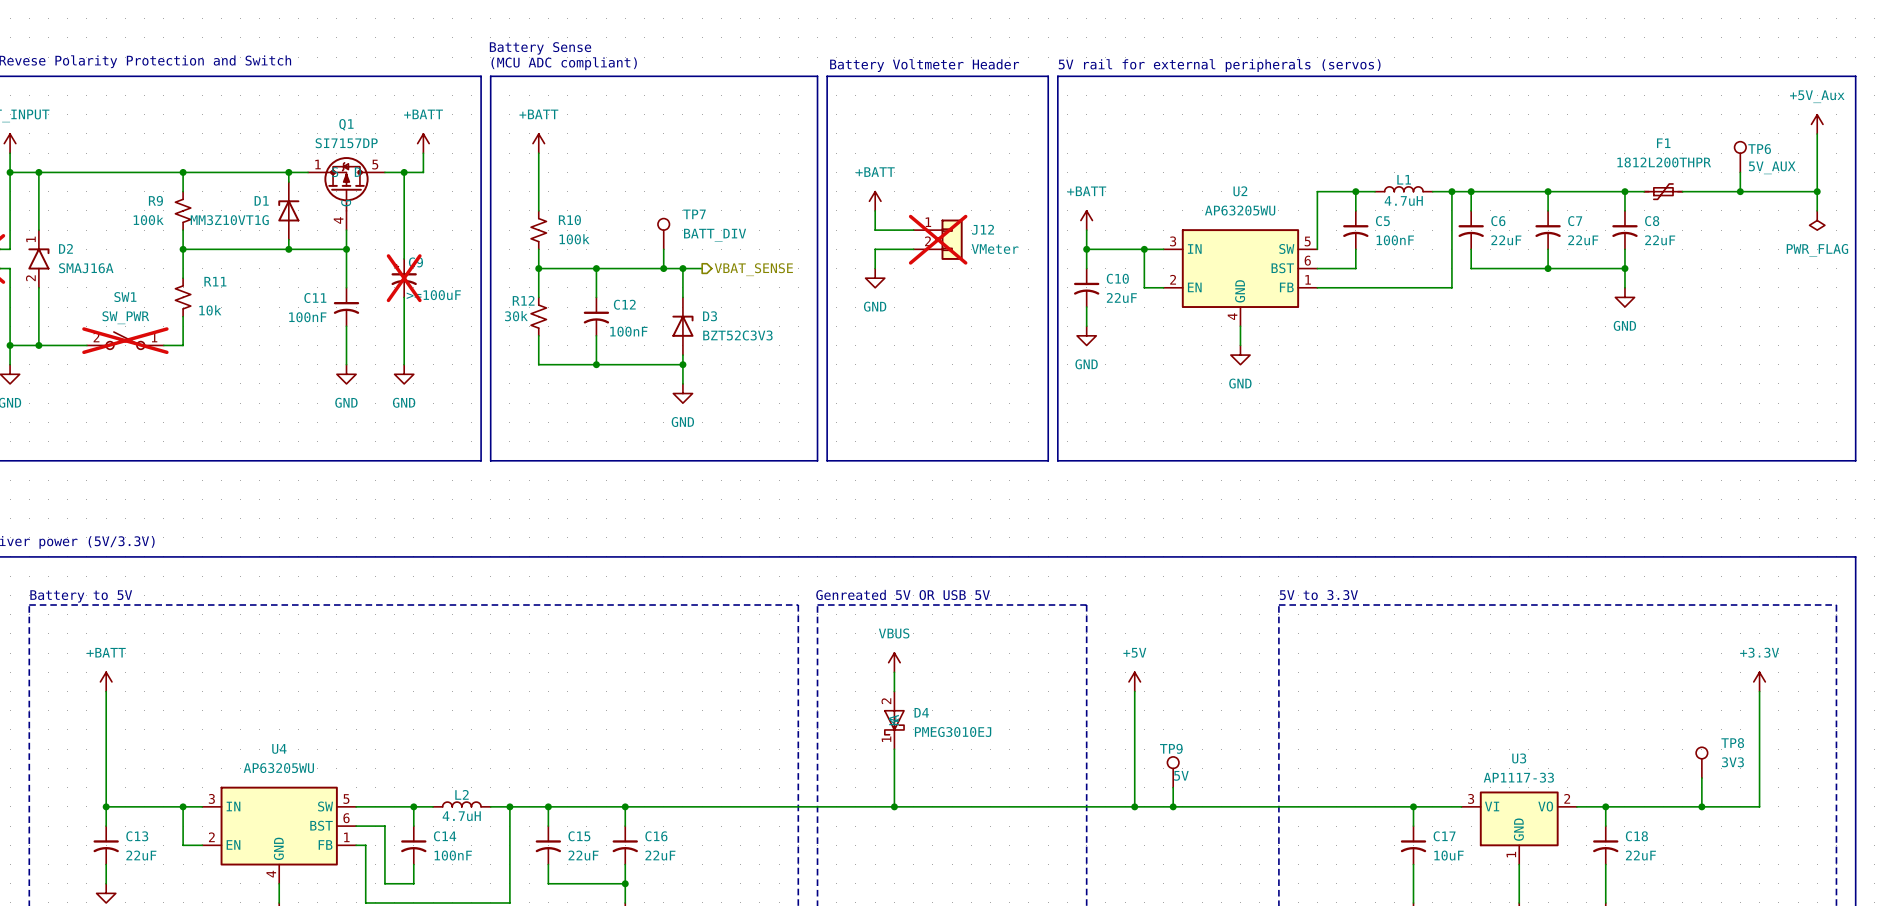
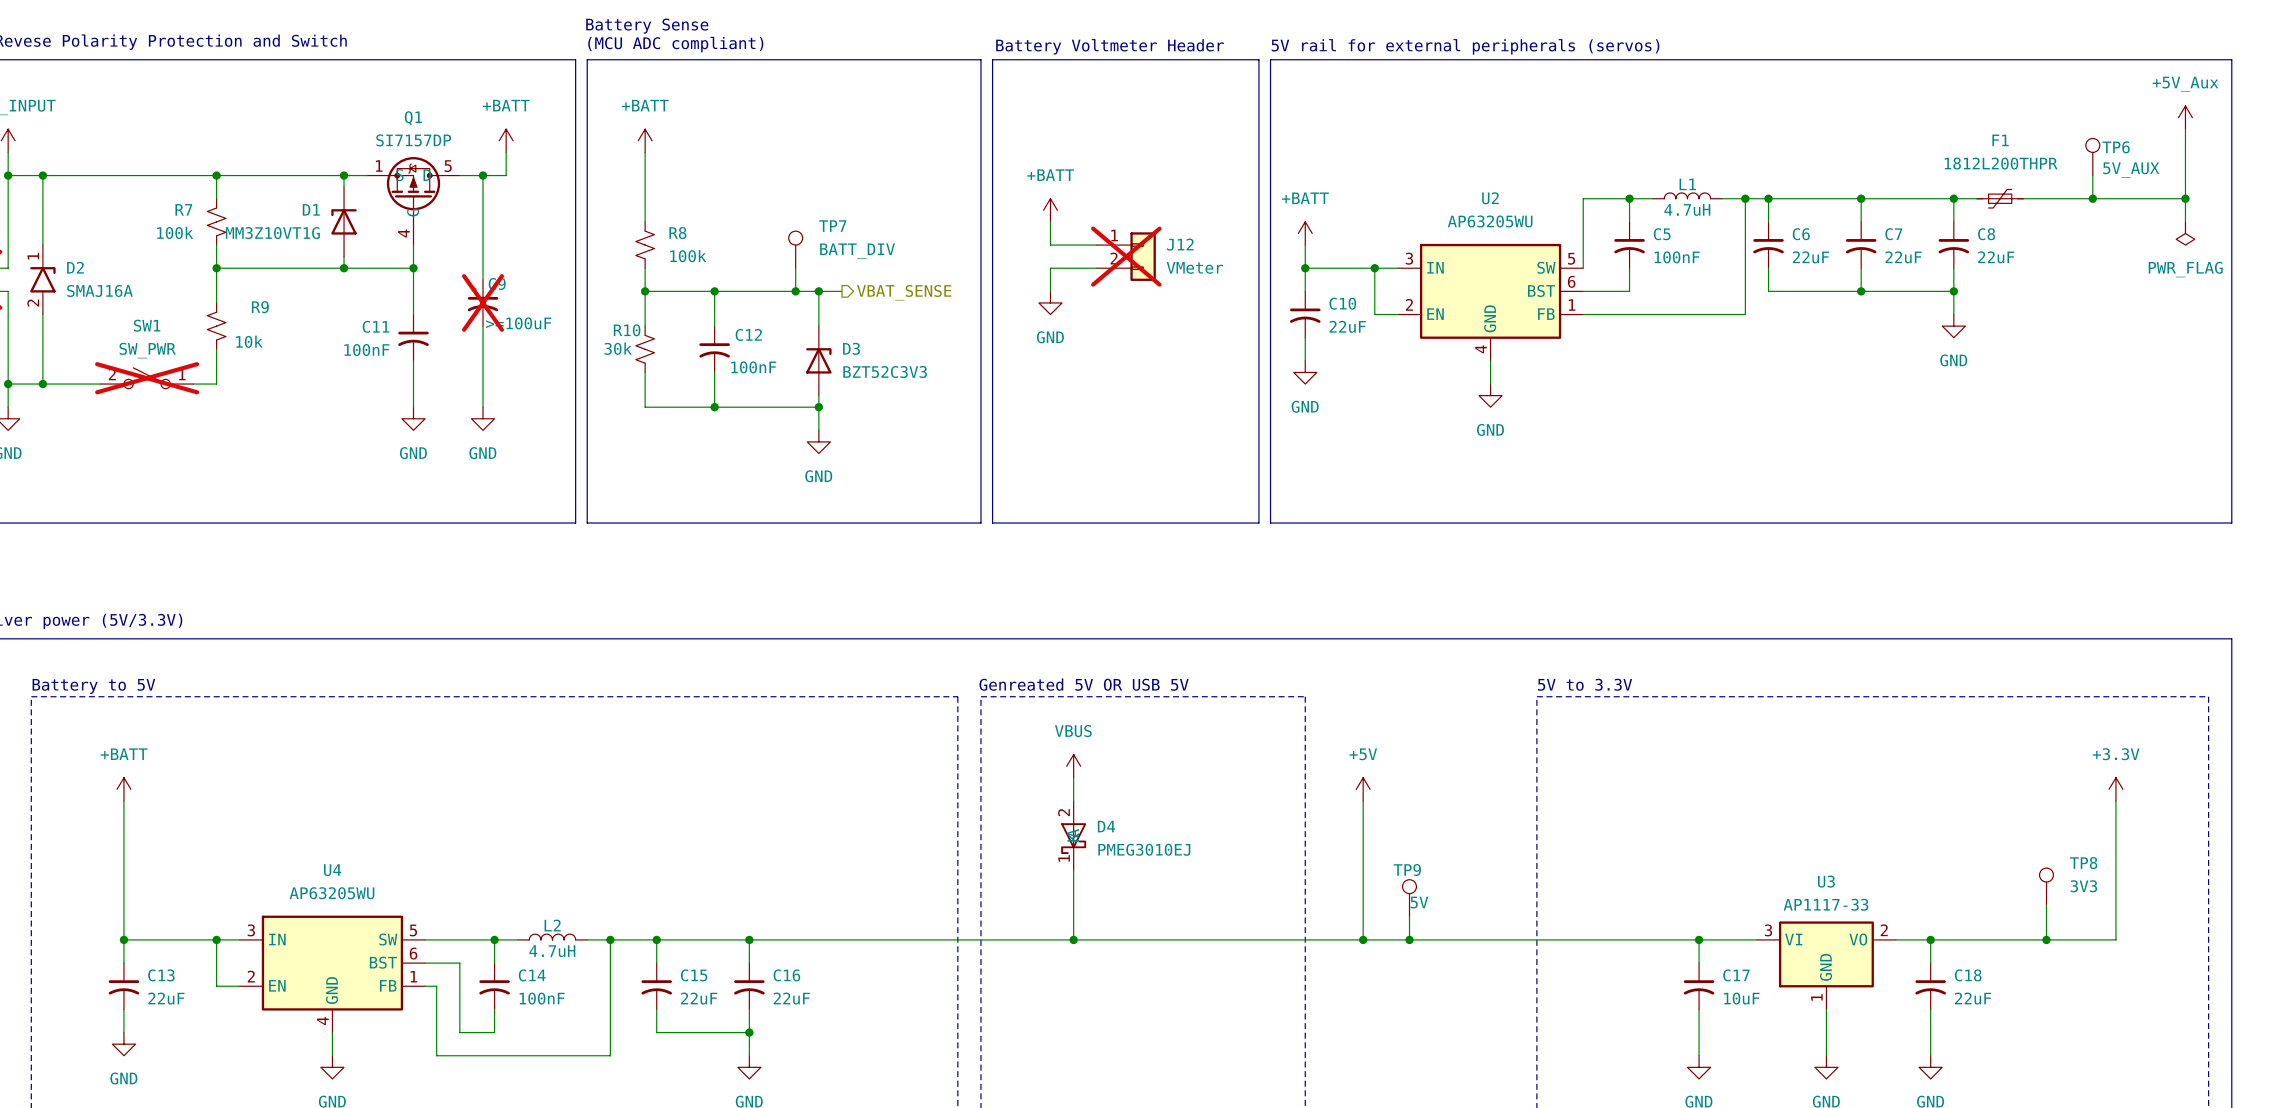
R9 name: R9 (155, 200) -> R7 (183, 209)
R10 name: R10 (569, 220) -> R8 (677, 233)
R11 name: R11 (215, 281) -> R9 (260, 307)
R12 name: R12 (523, 300) -> R10 (627, 330)

